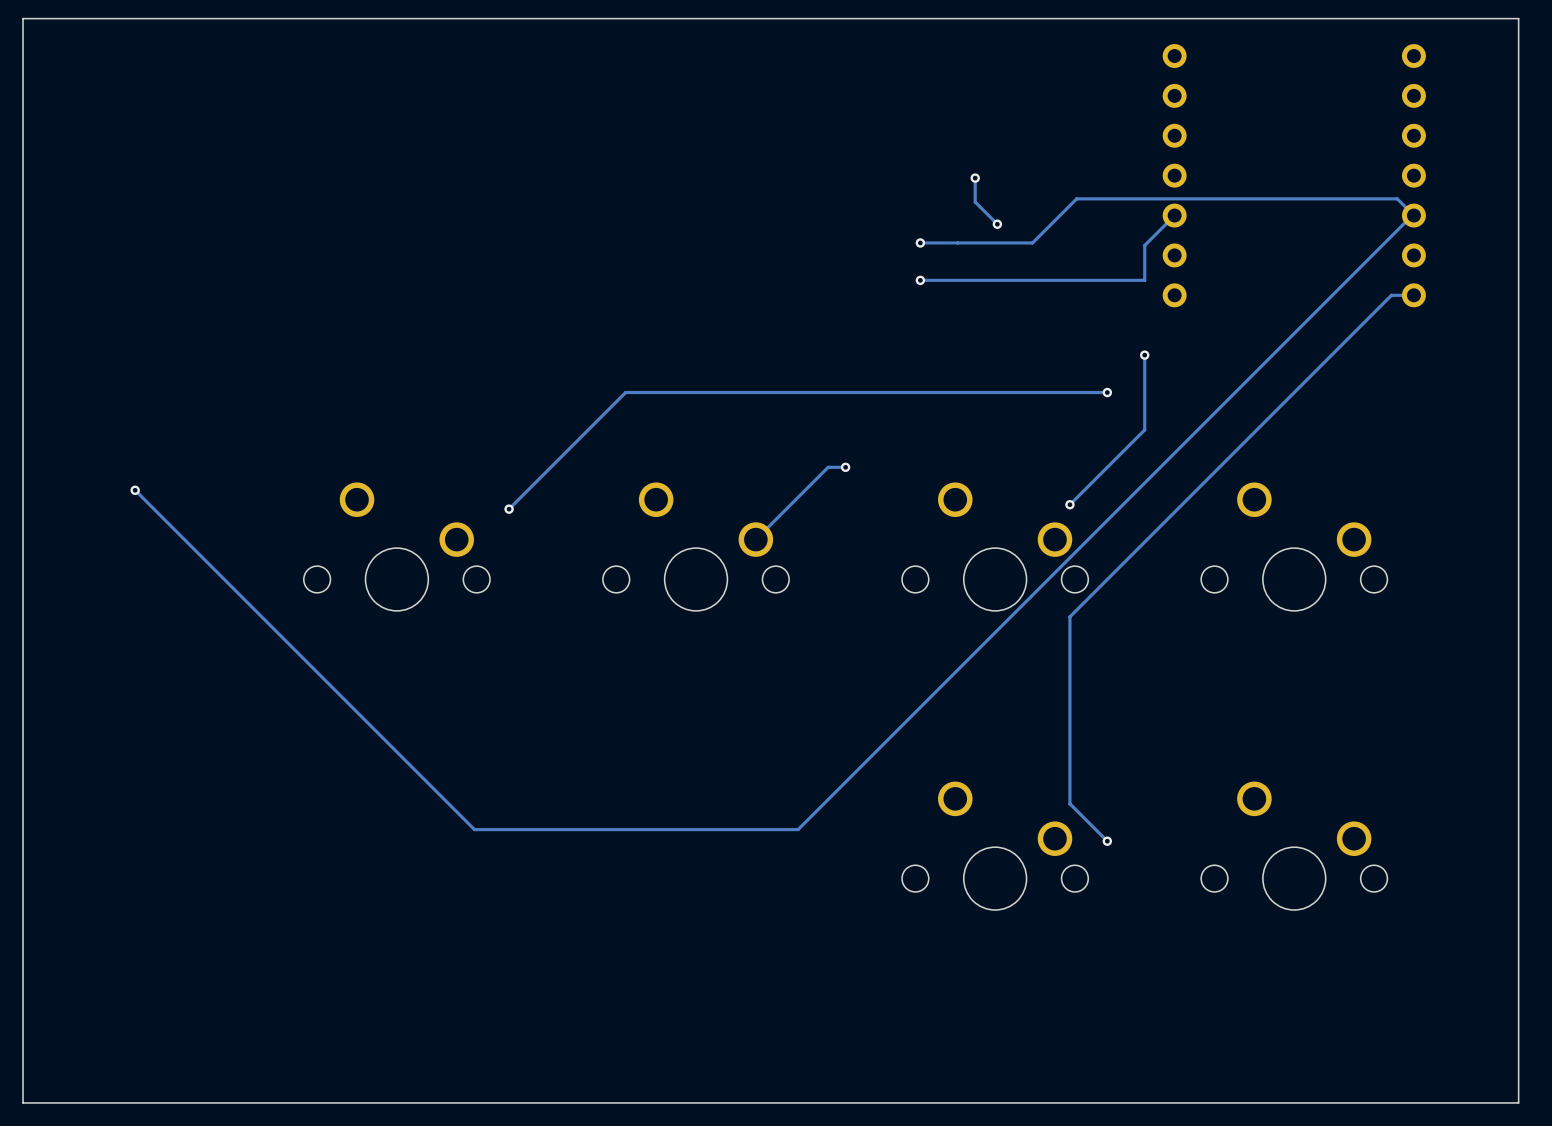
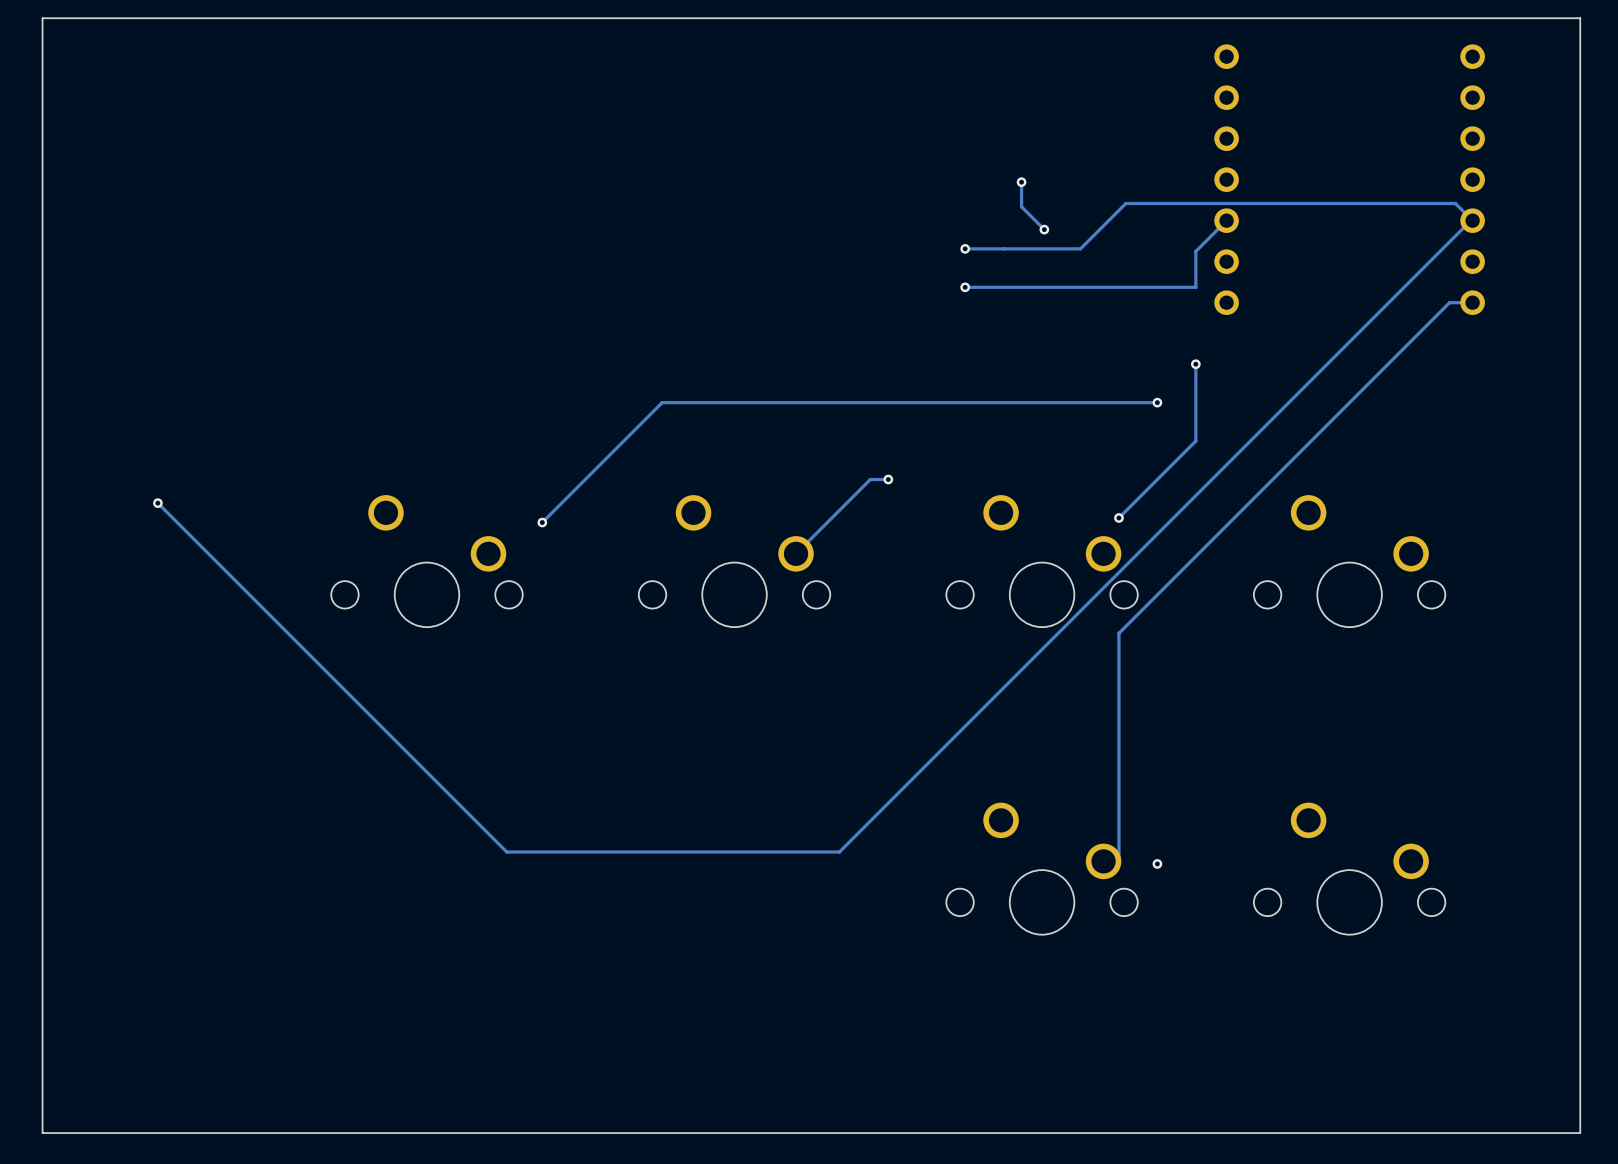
track: (1069, 803) (1107, 841) -> (1118, 825) (1118, 863)

